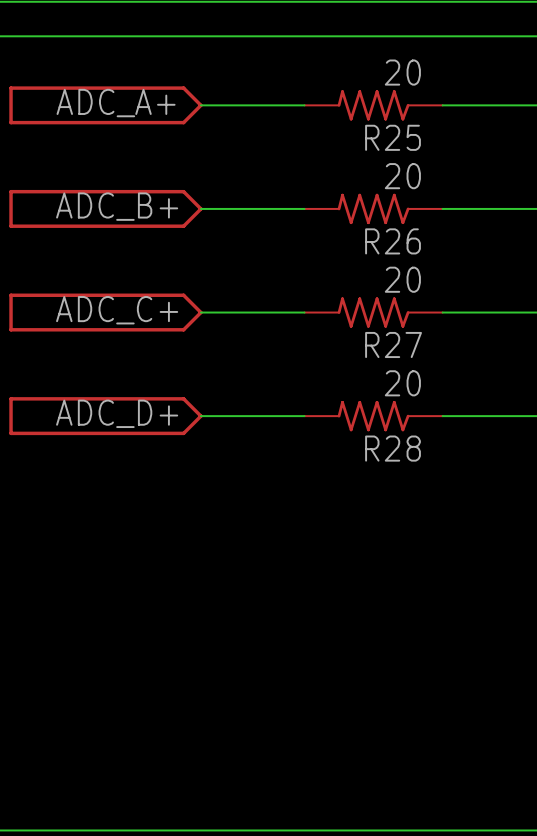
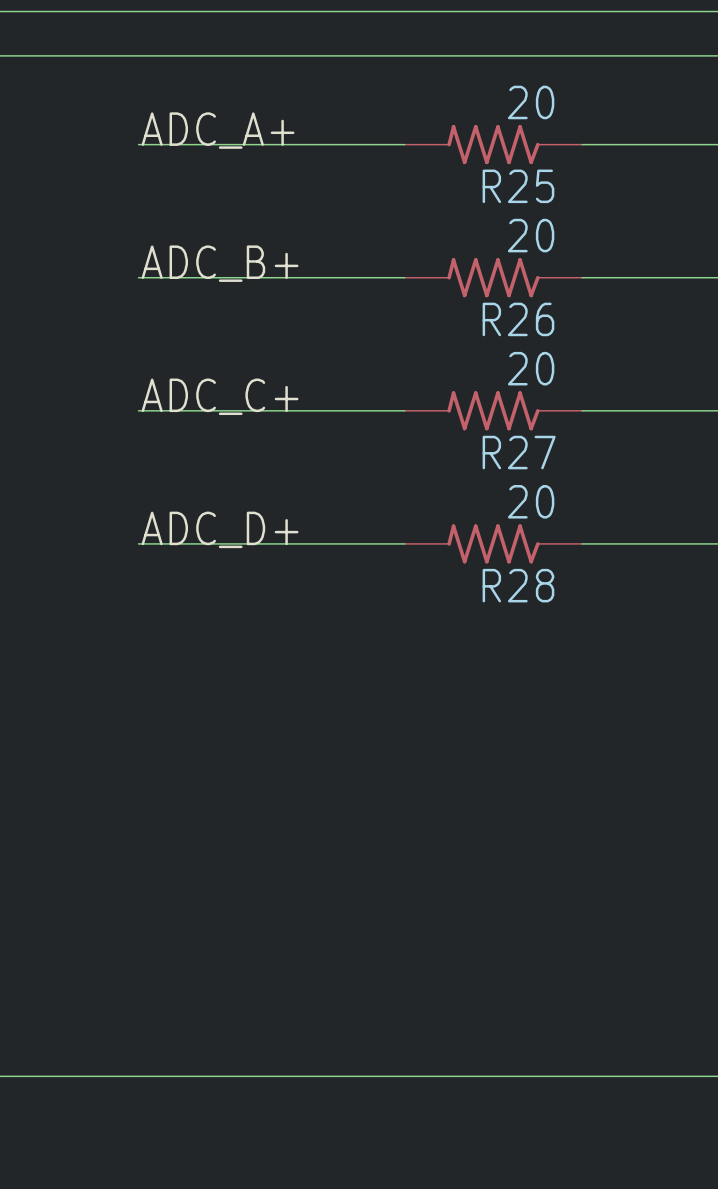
label position: ADC_A+ (116, 103) -> ADC_A+ (218, 130)
wire: none -> (138, 144) (271, 144)
part: (105, 105) -> none
label position: ADC_B+ (117, 206) -> ADC_B+ (220, 263)
wire: none -> (138, 277) (271, 277)
part: (105, 208) -> none
label position: ADC_C+ (117, 310) -> ADC_C+ (220, 396)
wire: none -> (138, 410) (271, 410)
part: (105, 312) -> none
label position: ADC_D+ (117, 413) -> ADC_D+ (220, 529)
wire: none -> (138, 543) (271, 543)
part: (105, 416) -> none

